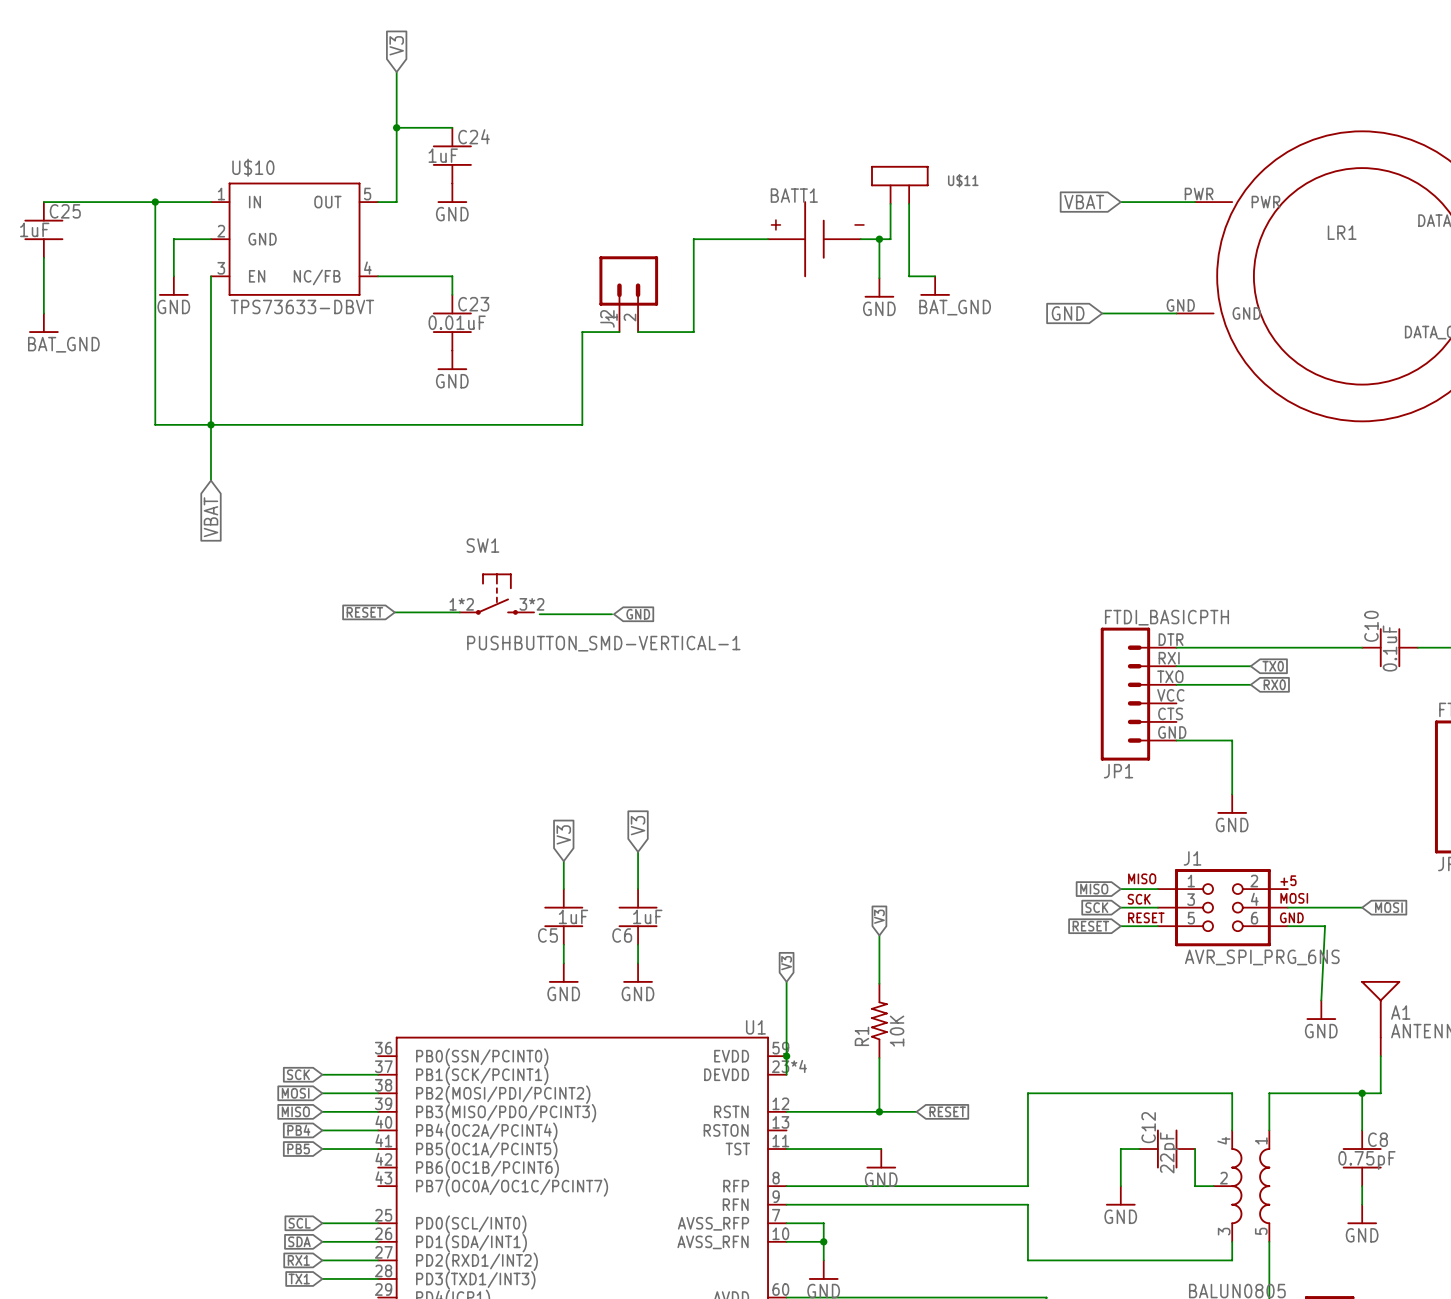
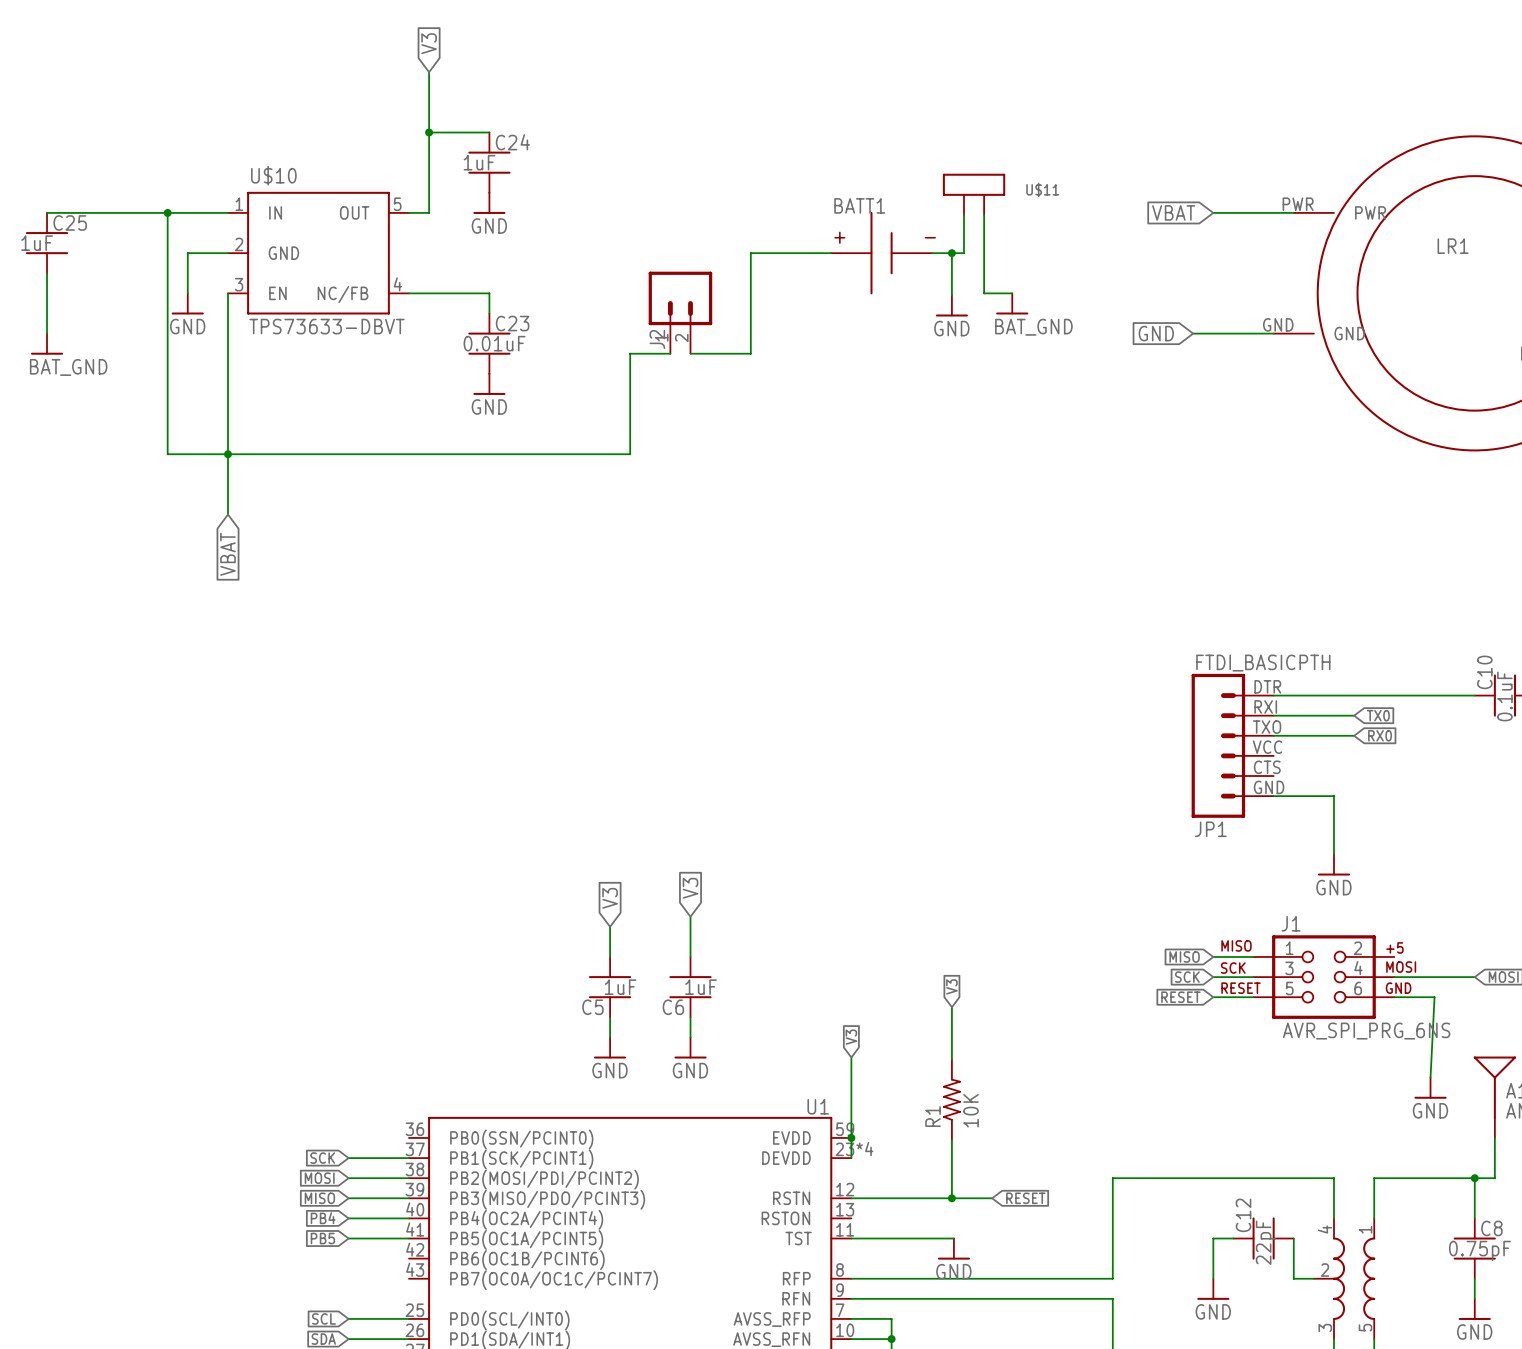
SW1: PUSHBUTTON_SMD-VERTICAL-1 (496, 594) -> none
global label: RESET (364, 612) -> none
wire: (394, 612) (459, 612) -> none
wire: (539, 614) (612, 614) -> none
global label: GND (638, 614) -> none

